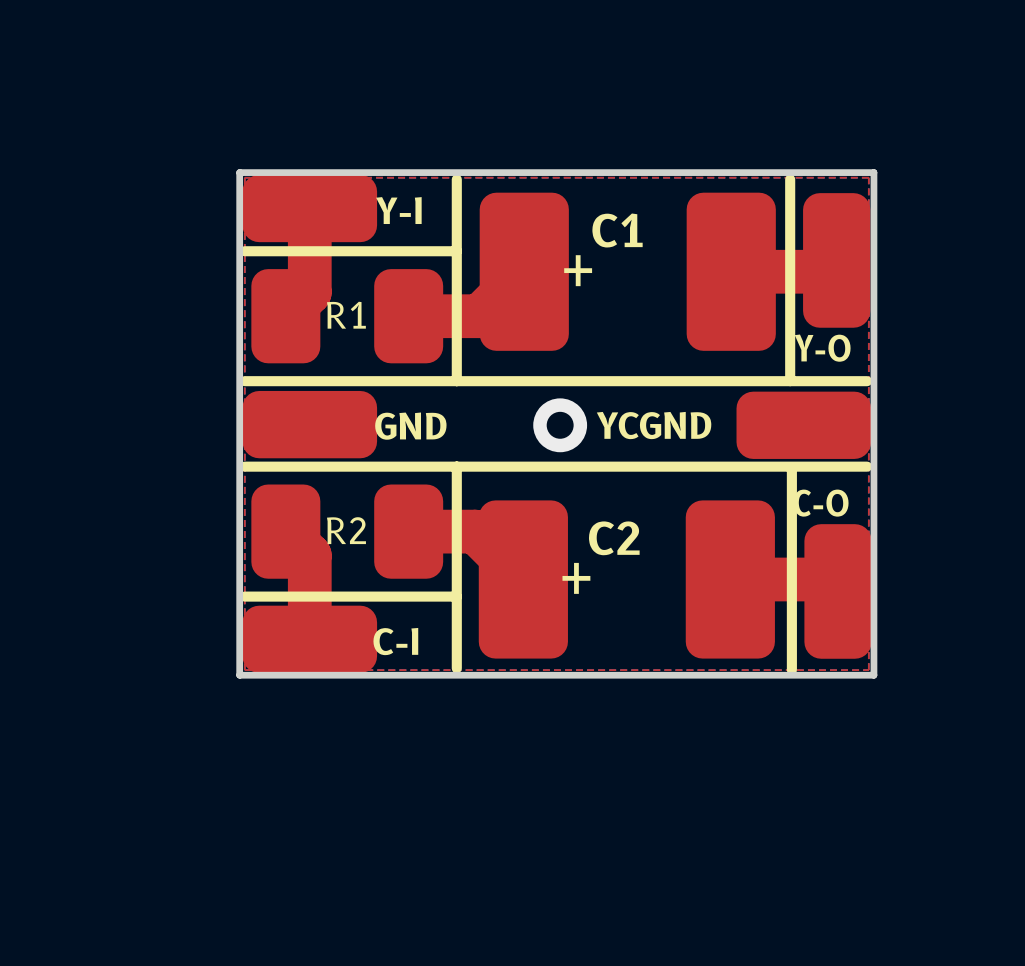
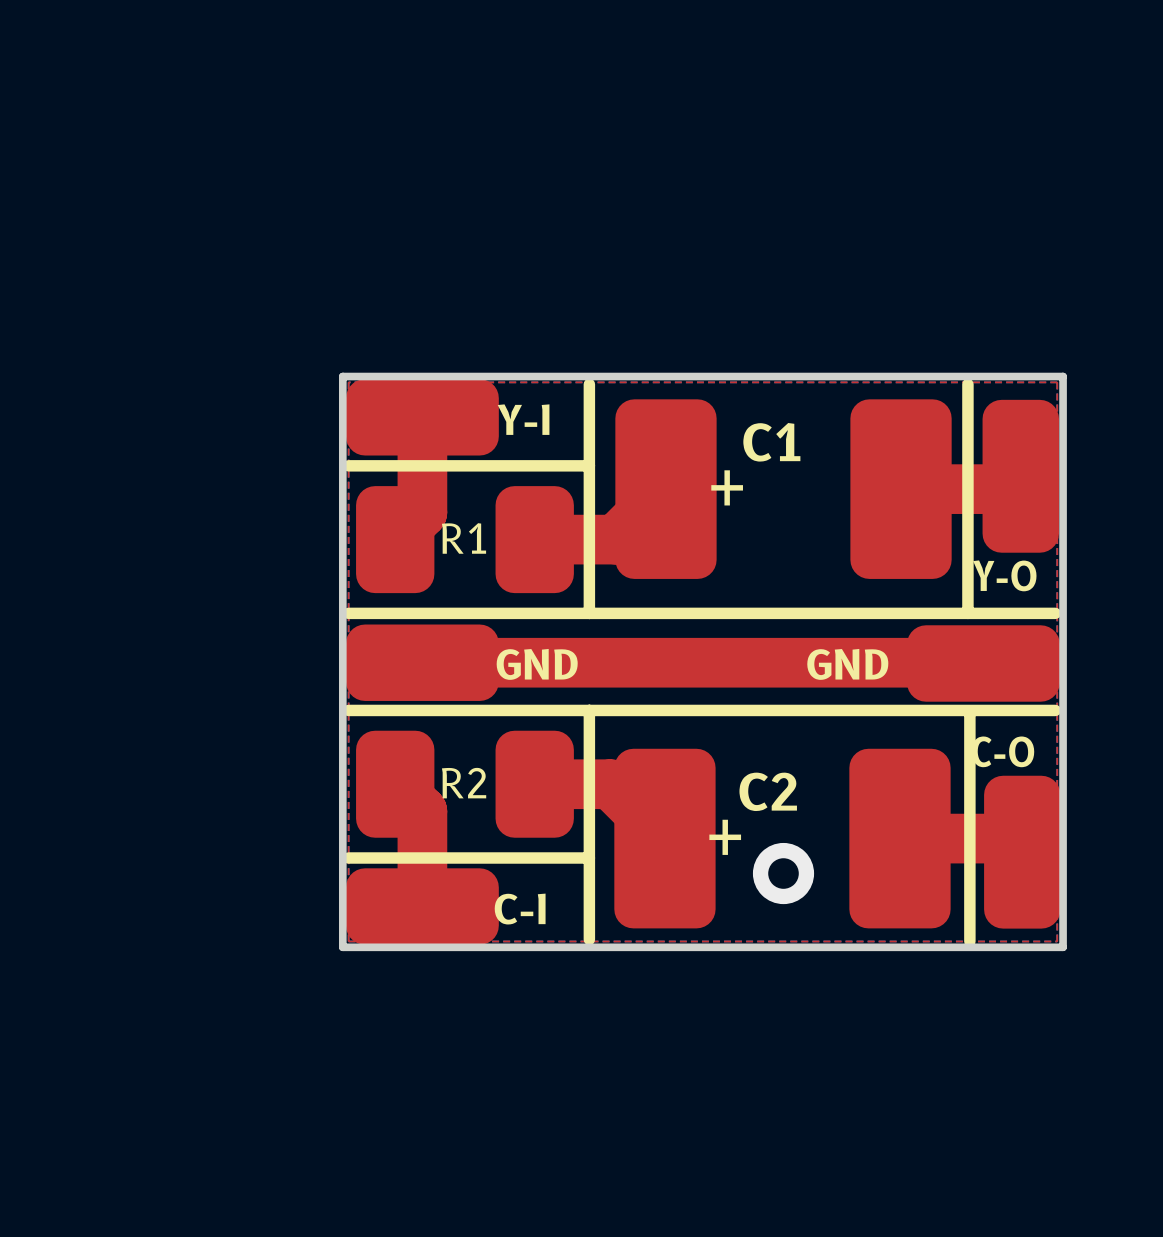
top track: none -> (422, 662) (982, 662)
via position: (560, 425) -> (783, 873)
text: YCGND (654, 425) -> GND (847, 664)

